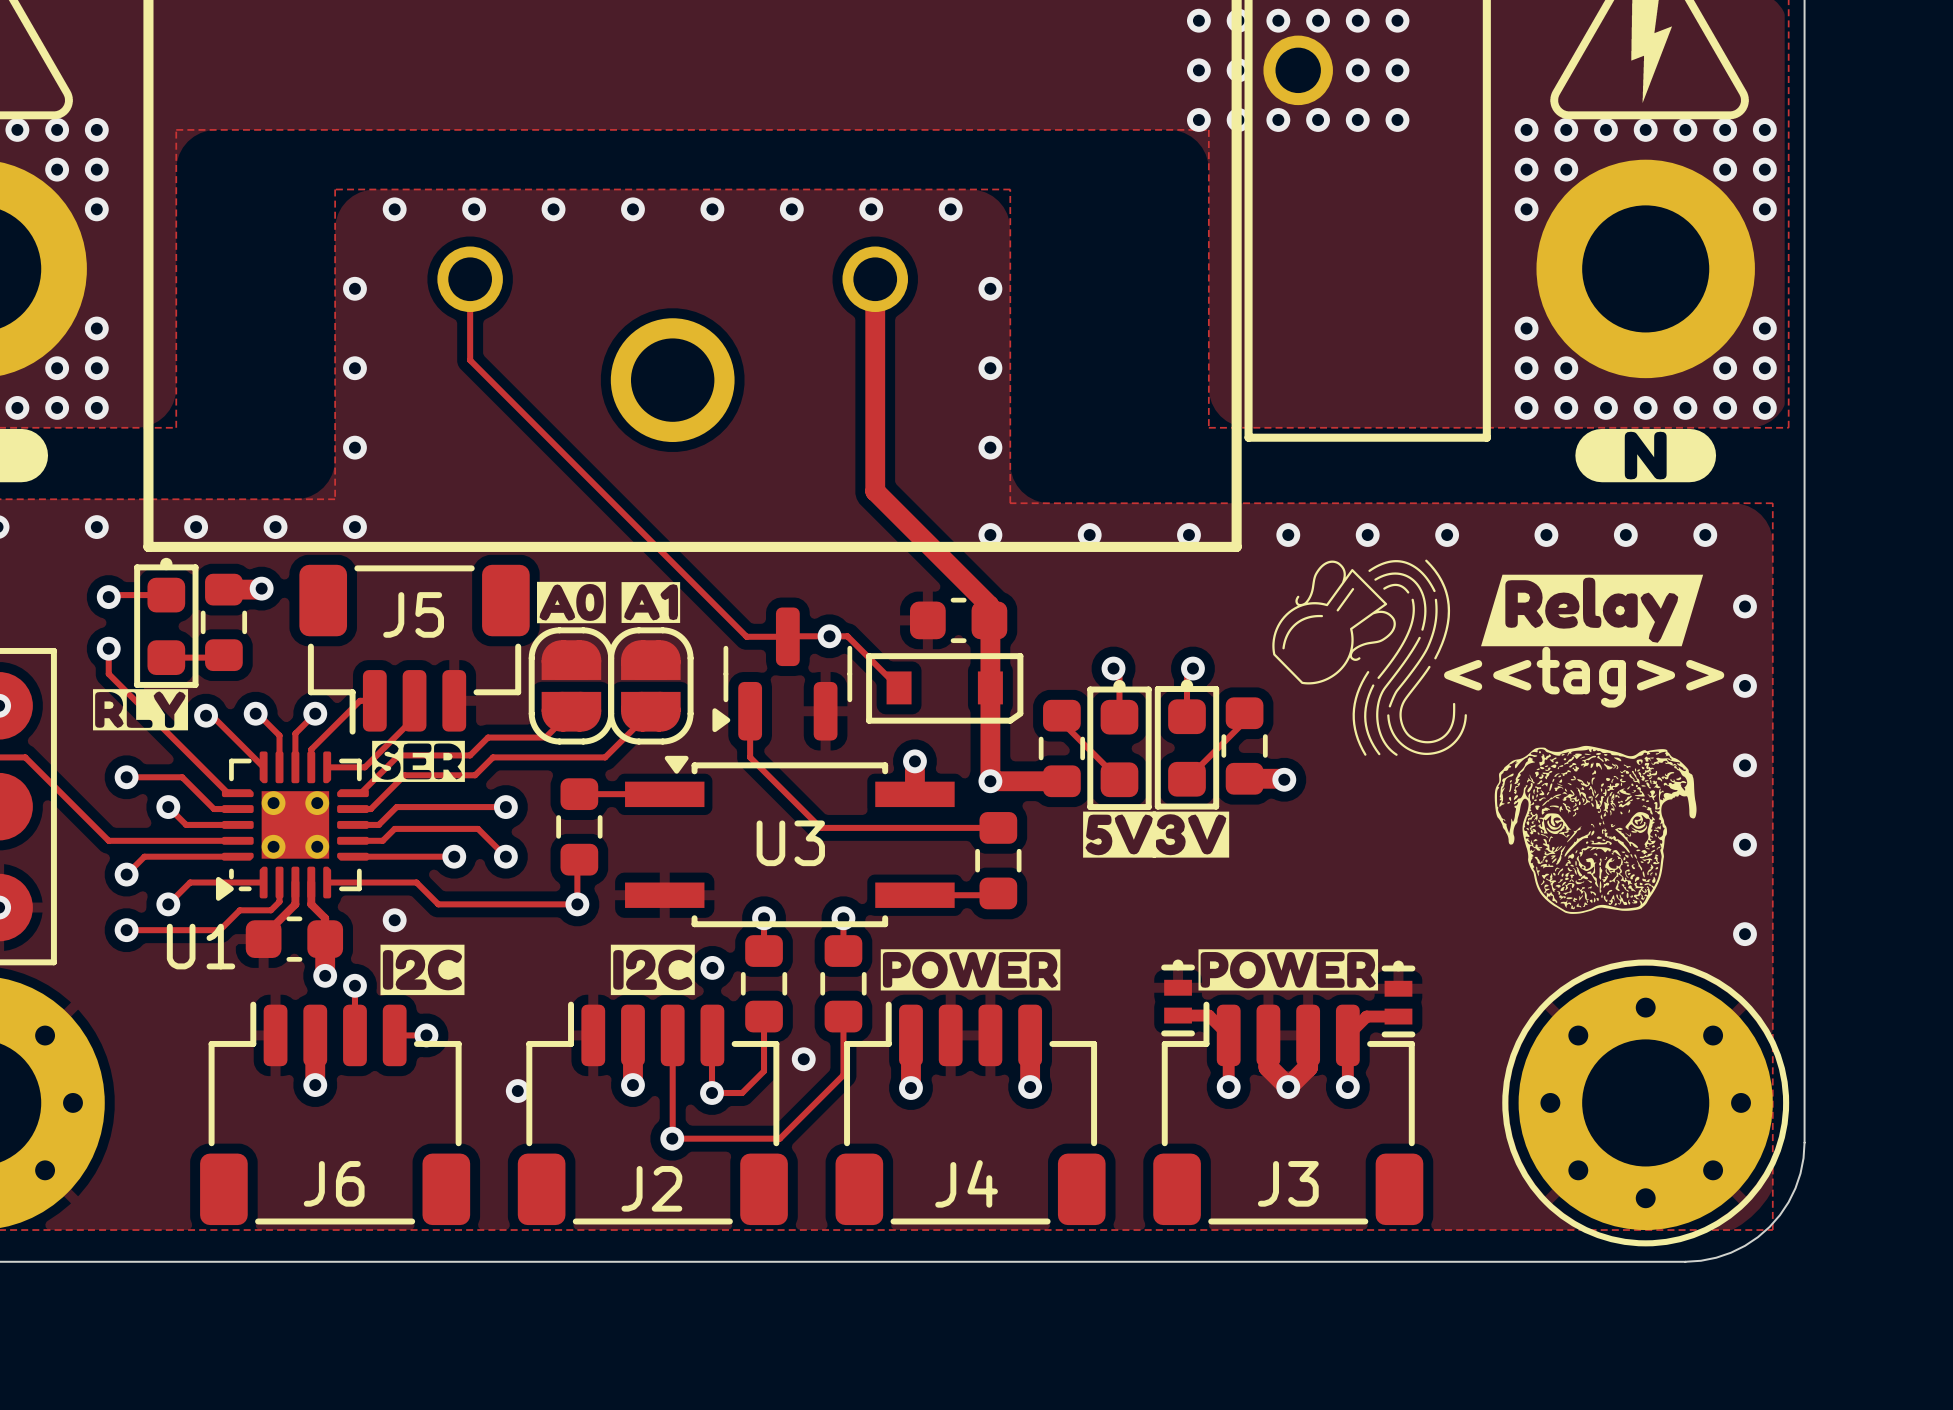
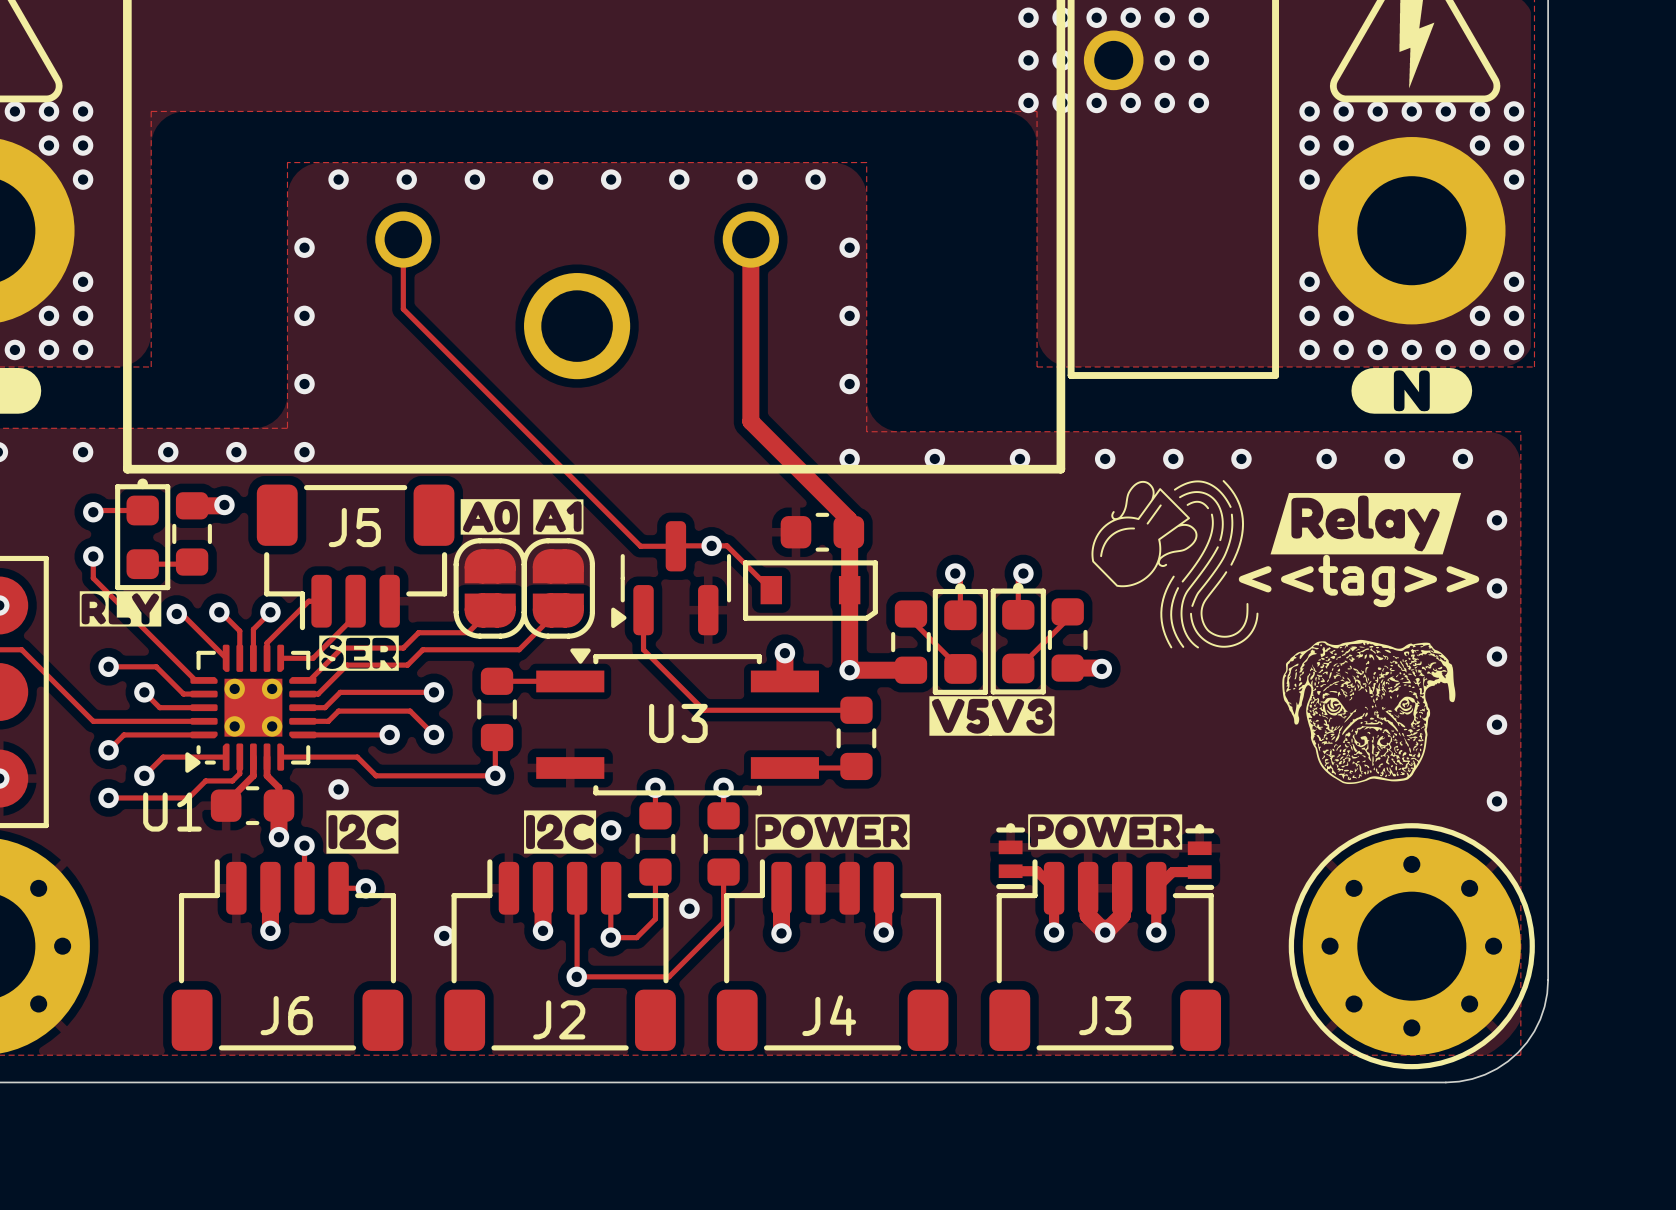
drawing shape: [1083, 811, 1156, 858] -> [929, 696, 992, 736]
drawing shape: [1152, 811, 1230, 858] -> [988, 696, 1055, 736]

